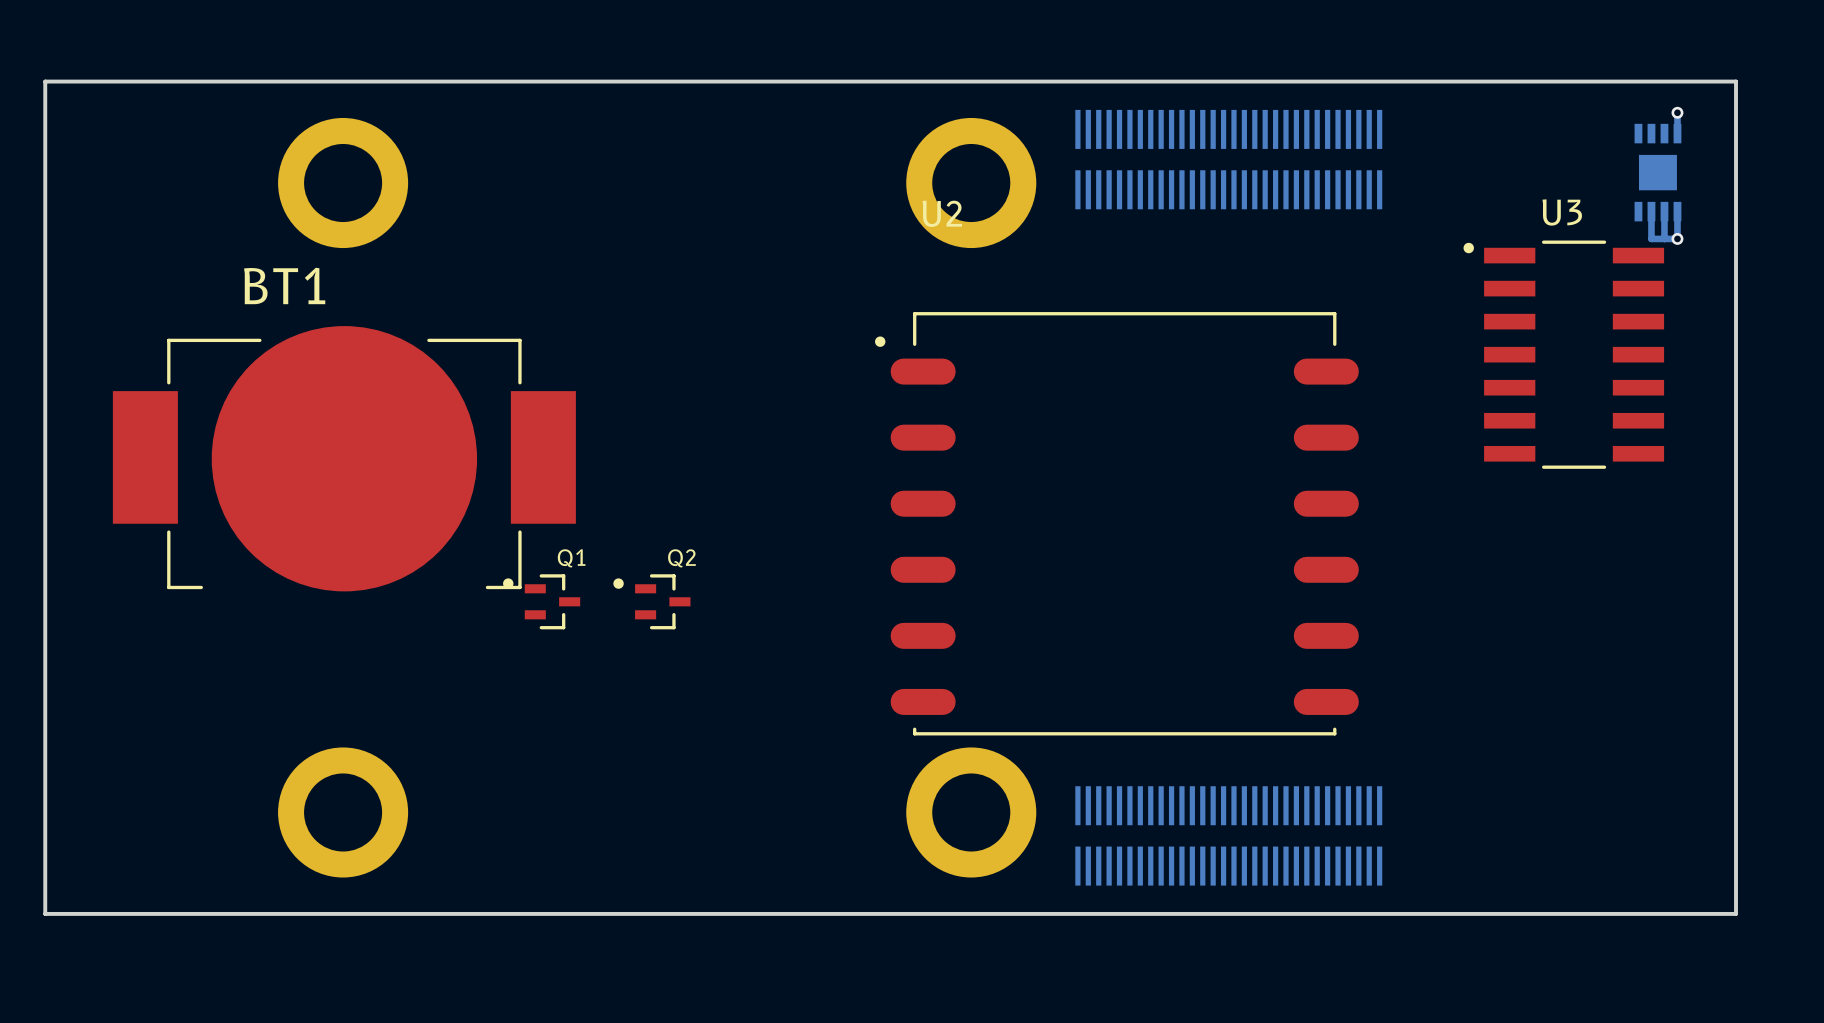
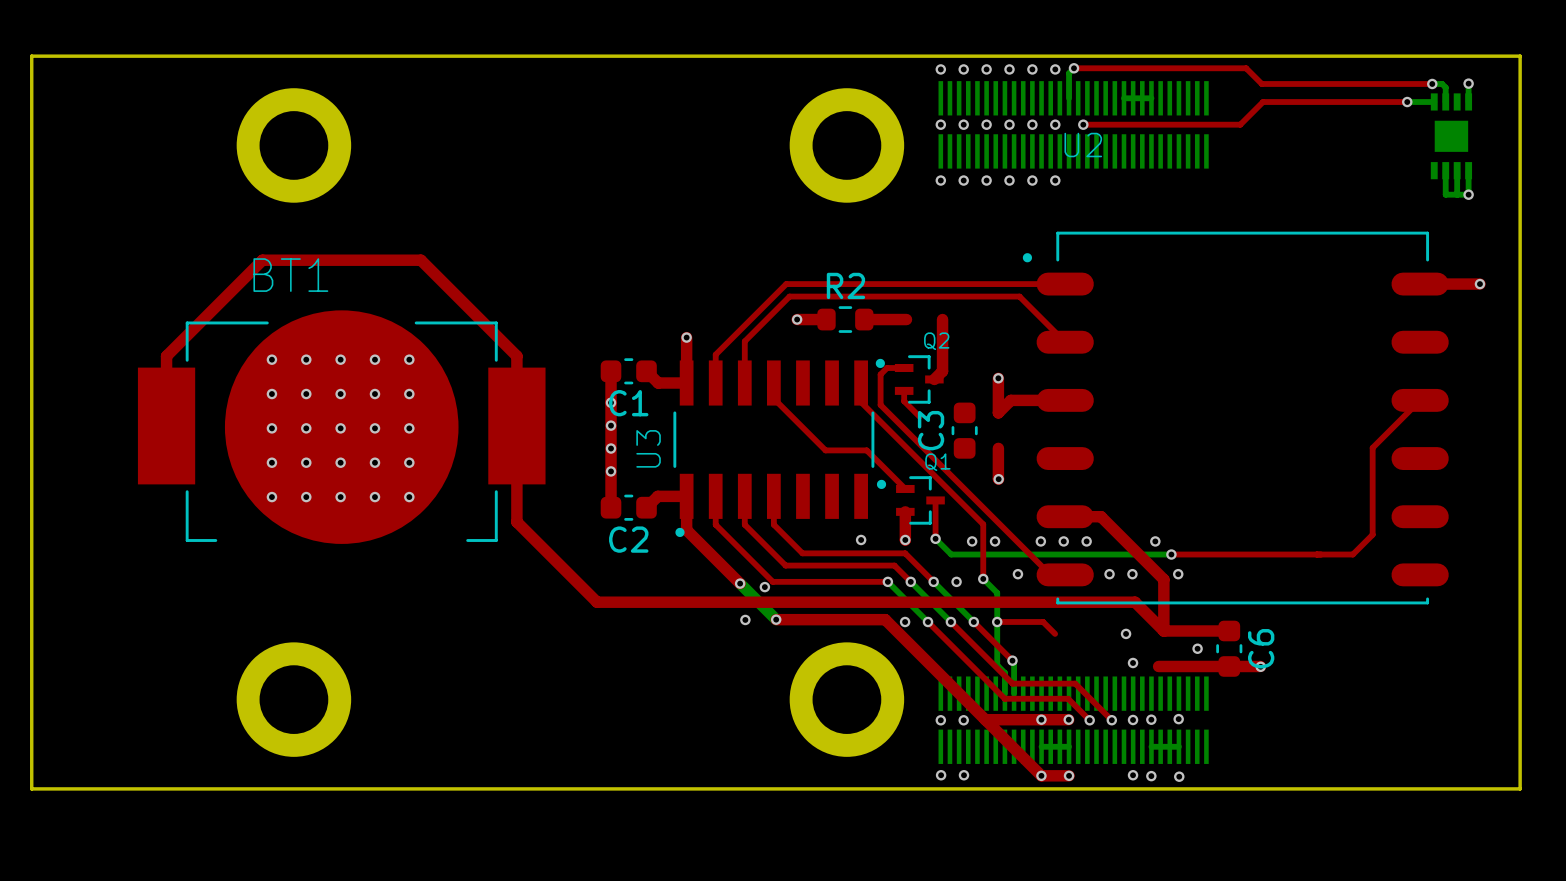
bottom track: none -> (1073, 68) (1069, 73) (1069, 98)
top track: none -> (1073, 68) (1246, 68) (1261, 83) (1432, 83)
via: none -> (1073, 68)
via: none -> (940, 69)
via: none -> (963, 69)
via: none -> (986, 69)
via: none -> (1009, 69)
via: none -> (1032, 69)
via: none -> (1055, 69)
bottom track: none -> (1432, 83) (1442, 83) (1445, 87) (1445, 101)
via: none -> (1432, 83)
bottom track: none -> (1123, 98) (1151, 98)
bottom track: none -> (1407, 102) (1434, 102)
top track: none -> (1407, 102) (1263, 102) (1240, 124) (1083, 124)
via: none -> (1407, 102)
via: none -> (940, 124)
via: none -> (963, 124)
via: none -> (986, 124)
via: none -> (1009, 124)
via: none -> (1032, 124)
via: none -> (1055, 124)
via: none -> (1083, 124)
via: none -> (940, 180)
via: none -> (963, 180)
via: none -> (986, 180)
via: none -> (1009, 180)
via: none -> (1032, 180)
via: none -> (1055, 180)
top track: none -> (1065, 284) (786, 284) (715, 354) (715, 383)
top track: none -> (1420, 284) (1479, 284)
via: none -> (1479, 284)
U3 rotation: 0° (1563, 354) -> 90° counterclockwise (773, 448)
U3 position: (1563, 354) -> (773, 448)
top track: none -> (797, 319) (826, 319)
via: none -> (797, 319)
R2: none -> (845, 319)
top track: none -> (864, 319) (906, 319)
top track: none -> (942, 319) (942, 371) (934, 379)
top track: none -> (686, 337) (686, 383) (658, 383) (646, 371)
via: none -> (686, 337)
top track: none -> (1065, 342) (1019, 296) (789, 296) (744, 341) (744, 383)
via: none -> (271, 359)
via: none -> (306, 359)
via: none -> (340, 359)
via: none -> (374, 359)
via: none -> (409, 359)
top track: none -> (904, 368) (887, 368) (880, 374) (880, 405) (1050, 574) (1065, 574)
top track: none -> (611, 371) (611, 507)
C1: none -> (628, 371)
top track: none -> (998, 378) (998, 412) (1010, 400) (1065, 400)
via: none -> (998, 378)
top track: none -> (773, 383) (773, 398) (825, 450) (866, 450) (905, 488)
top track: none -> (861, 383) (861, 402) (983, 524) (983, 578)
BT1 position: (344, 458) -> (341, 427)
top track: none -> (904, 390) (904, 401) (919, 416)
via: none -> (271, 394)
via: none -> (306, 394)
via: none -> (340, 394)
via: none -> (374, 394)
via: none -> (409, 394)
top track: none -> (1420, 400) (1372, 447) (1372, 534) (1352, 554) (1171, 554)
via: none -> (611, 402)
top track: none -> (166, 426) (166, 356) (262, 260) (420, 260) (516, 356) (516, 522) (597, 602) (1135, 602) (1163, 630)
via: none -> (611, 425)
via: none -> (271, 428)
via: none -> (306, 428)
via: none -> (340, 428)
via: none -> (374, 428)
via: none -> (409, 428)
C3: none -> (964, 430)
U2 position: (1116, 523) -> (1235, 418)
via: none -> (611, 448)
top track: none -> (998, 448) (998, 478)
via: none -> (271, 462)
via: none -> (306, 462)
via: none -> (340, 462)
via: none -> (374, 462)
via: none -> (409, 462)
via: none -> (611, 471)
via: none -> (998, 479)
top track: none -> (715, 496) (715, 524) (772, 581) (887, 581)
top track: none -> (744, 496) (744, 524) (785, 565) (894, 565) (910, 581)
top track: none -> (773, 496) (773, 524) (802, 553) (905, 553) (933, 581)
via: none -> (271, 497)
via: none -> (306, 497)
via: none -> (340, 497)
via: none -> (374, 497)
via: none -> (409, 497)
top track: none -> (935, 500) (935, 538)
C2: none -> (628, 507)
top track: none -> (646, 507) (657, 496) (686, 496) (686, 530) (740, 583)
top track: none -> (905, 511) (905, 539)
Q1 position: (541, 601) -> (910, 500)
Q2 position: (651, 601) -> (909, 379)
top track: none -> (1065, 516) (1101, 516) (1163, 579) (1163, 630)
bottom track: none -> (935, 538) (951, 554) (1174, 554)
via: none -> (935, 538)
via: none -> (861, 539)
via: none -> (905, 539)
via: none -> (972, 541)
via: none -> (995, 541)
via: none -> (1040, 541)
via: none -> (1063, 541)
via: none -> (1086, 541)
via: none -> (1155, 541)
via: none -> (1171, 554)
via: none -> (1017, 574)
via: none -> (1109, 574)
via: none -> (1132, 574)
via: none -> (1178, 574)
bottom track: none -> (983, 578) (997, 592) (997, 665) (1004, 672) (1004, 693)
via: none -> (983, 578)
bottom track: none -> (887, 581) (928, 621)
via: none -> (887, 581)
bottom track: none -> (910, 581) (950, 621)
via: none -> (910, 581)
bottom track: none -> (933, 581) (973, 621)
via: none -> (933, 581)
via: none -> (956, 581)
bottom track: none -> (740, 583) (776, 619)
via: none -> (740, 583)
via: none -> (764, 587)
top track: none -> (776, 619) (885, 619) (1041, 775) (1069, 775)
via: none -> (776, 619)
via: none -> (745, 619)
via: none -> (905, 621)
top track: none -> (928, 621) (1004, 698) (1068, 698) (1089, 720)
via: none -> (928, 621)
top track: none -> (950, 621) (1012, 683) (1075, 683) (1111, 720)
via: none -> (950, 621)
top track: none -> (973, 621) (1012, 660)
via: none -> (973, 621)
top track: none -> (997, 621) (1043, 621) (1055, 633)
via: none -> (997, 621)
top track: none -> (1163, 630) (1229, 630)
via: none -> (1126, 633)
via: none -> (1197, 648)
C6: none -> (1229, 648)
bottom track: none -> (1012, 660) (1014, 662) (1014, 693)
via: none -> (1012, 660)
via: none -> (1133, 662)
top track: none -> (1158, 666) (1260, 666)
via: none -> (1260, 666)
via: none -> (1178, 719)
via: none -> (940, 720)
via: none -> (963, 720)
top track: none -> (985, 719) (1068, 719)
via: none -> (1041, 719)
via: none -> (1068, 719)
via: none -> (1089, 720)
via: none -> (1111, 720)
via: none -> (1133, 719)
via: none -> (1151, 719)
bottom track: none -> (1041, 746) (1069, 746)
bottom track: none -> (1151, 746) (1178, 746)
via: none -> (941, 775)
via: none -> (963, 775)
via: none -> (1133, 775)
via: none -> (1041, 775)
via: none -> (1069, 775)
via: none -> (1151, 776)
via: none -> (1179, 776)

